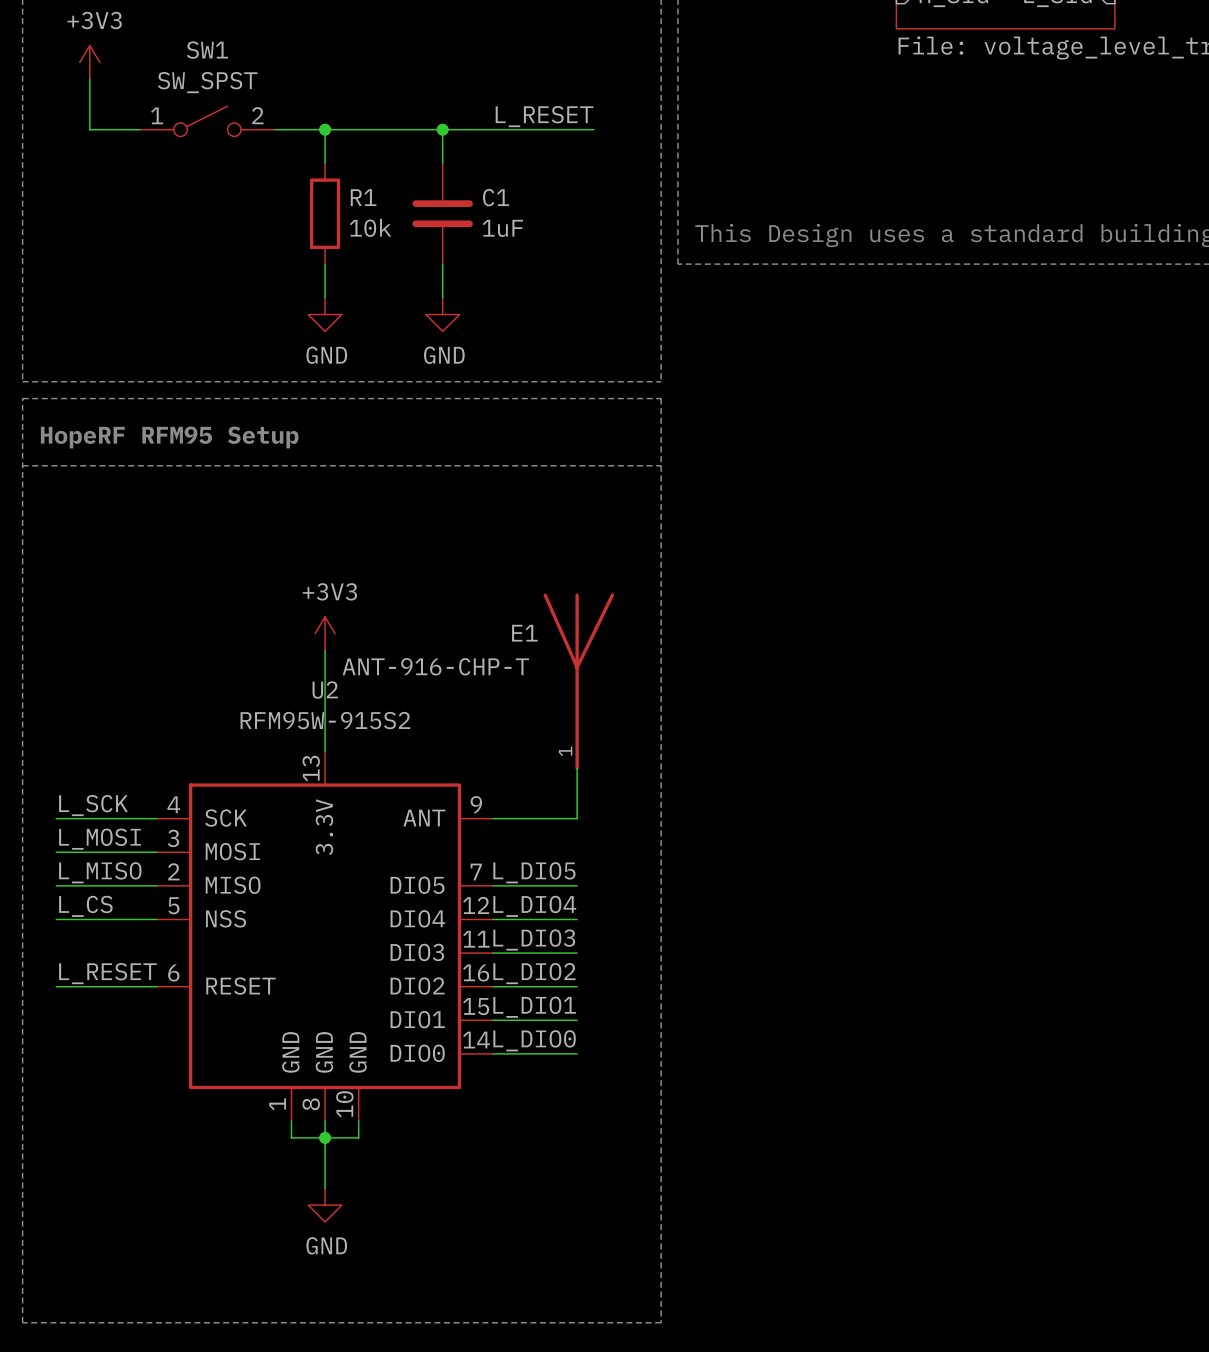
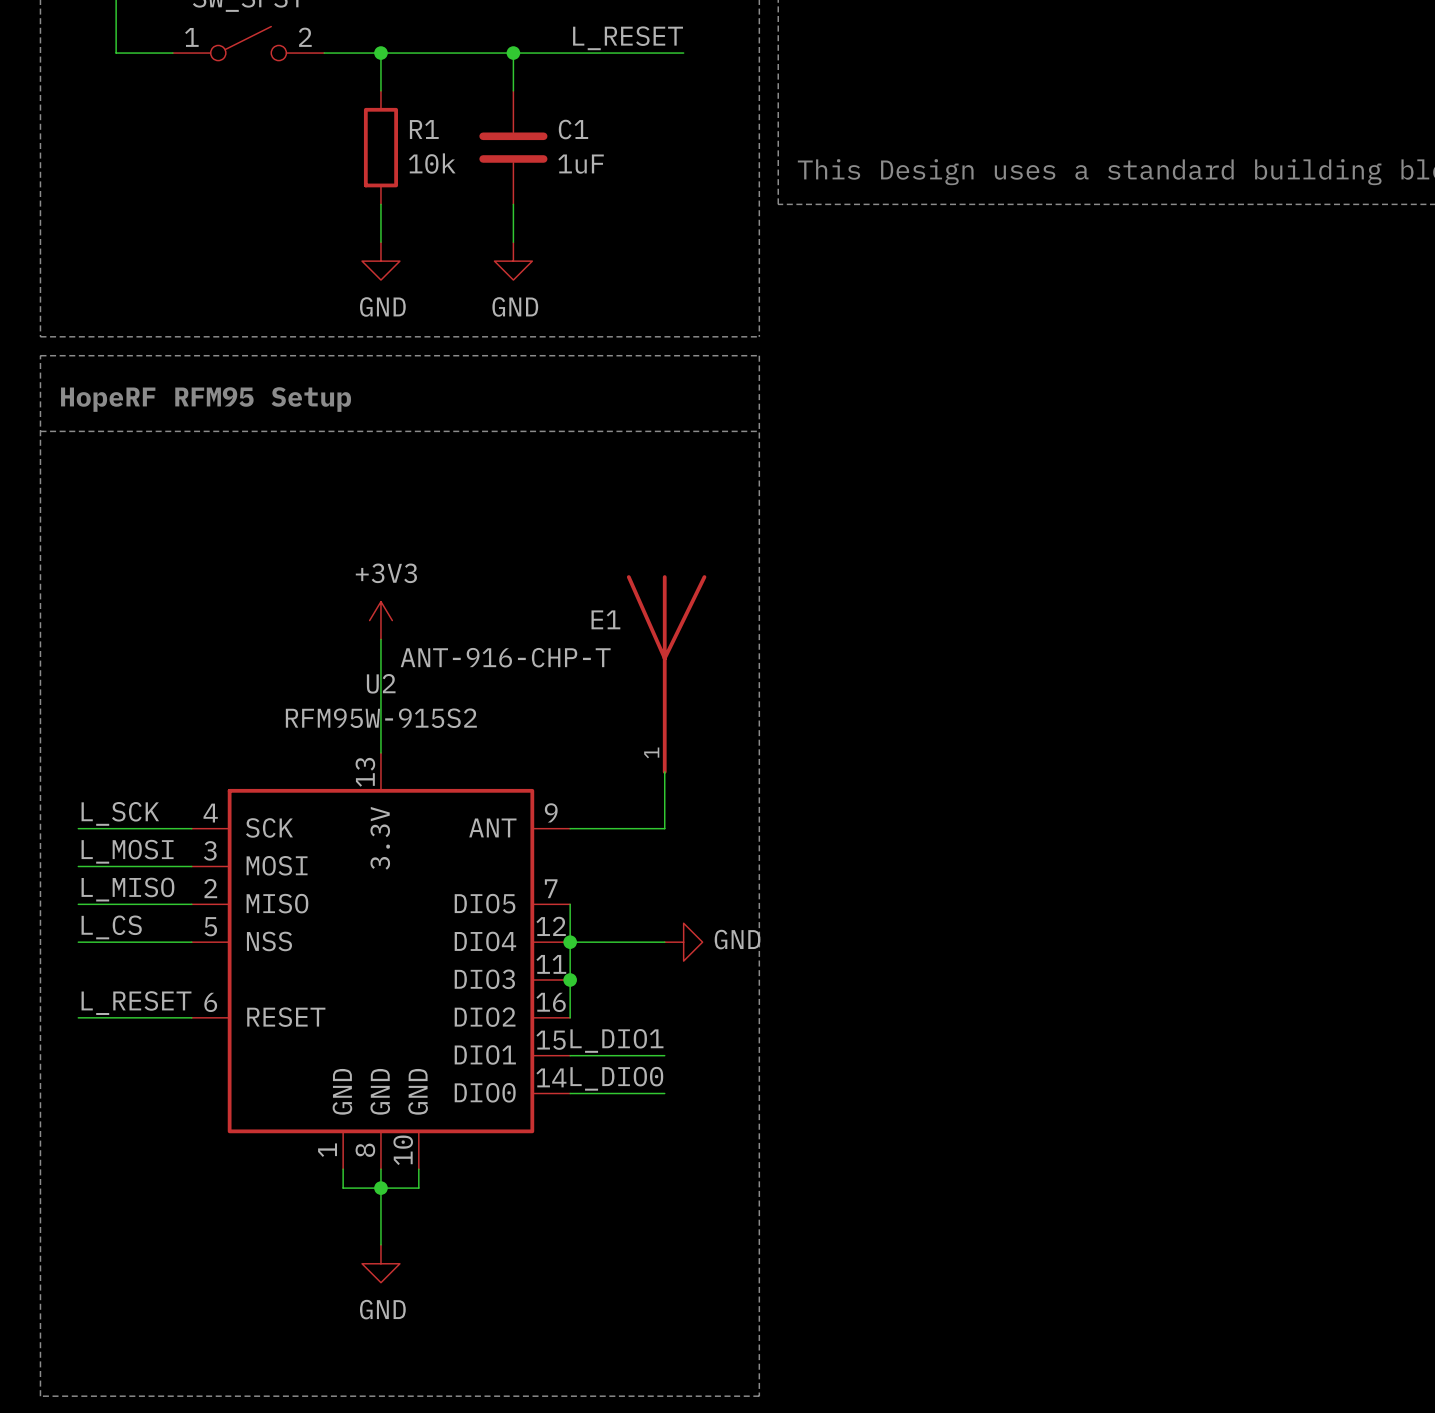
label: L_DIO5 (534, 872) -> none
wire: (493, 885) (577, 885) -> (570, 904) (570, 1017)
label: L_DIO4 (534, 906) -> none
junction: none -> (570, 942)
power symbol: none -> GND (683, 942)
label: L_DIO3 (534, 939) -> none
wire: (493, 953) (577, 953) -> none
junction: none -> (570, 980)
label: L_DIO2 (534, 973) -> none
wire: (493, 986) (577, 986) -> none

